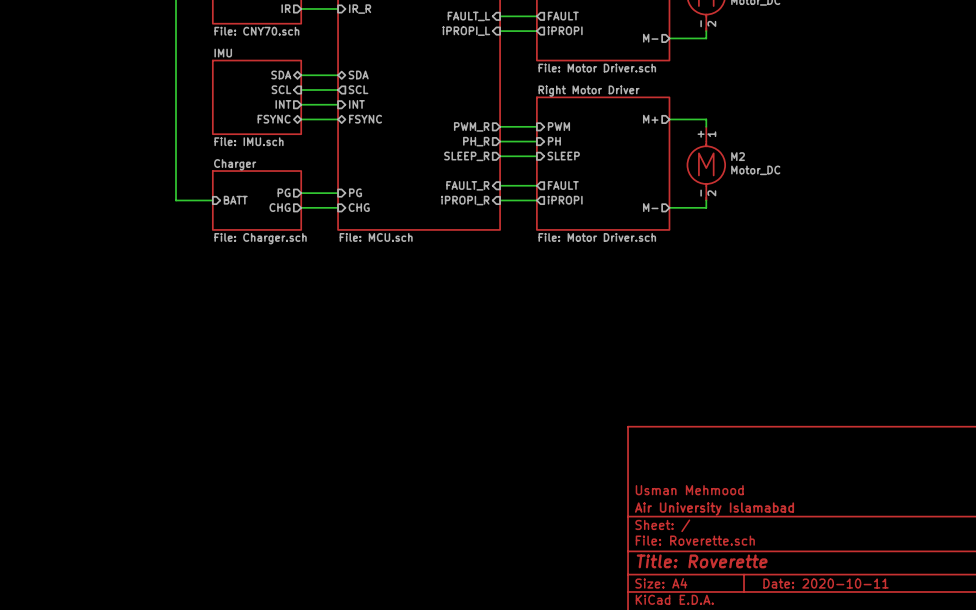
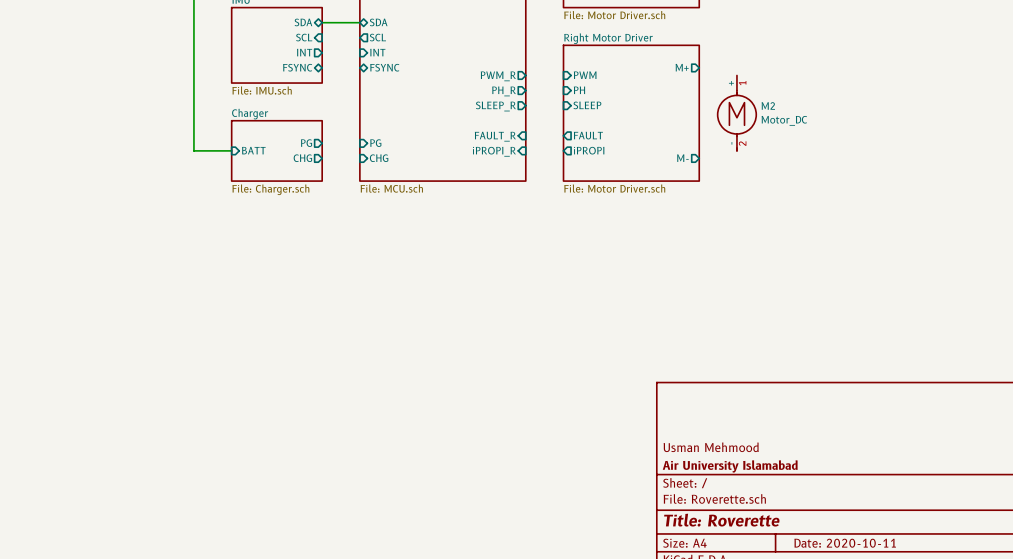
wire: (301, 90) (338, 90) -> none
wire: (301, 104) (338, 104) -> none
wire: (301, 119) (338, 119) -> none
wire: (669, 119) (706, 119) (706, 126) -> none
wire: (500, 126) (536, 126) -> none
wire: (500, 141) (536, 141) -> none
wire: (500, 156) (536, 156) -> none
wire: (500, 185) (536, 185) -> none
wire: (301, 193) (338, 193) -> none
wire: (500, 200) (536, 200) -> none
wire: (706, 200) (706, 207) (669, 207) -> none
wire: (301, 207) (338, 207) -> none

